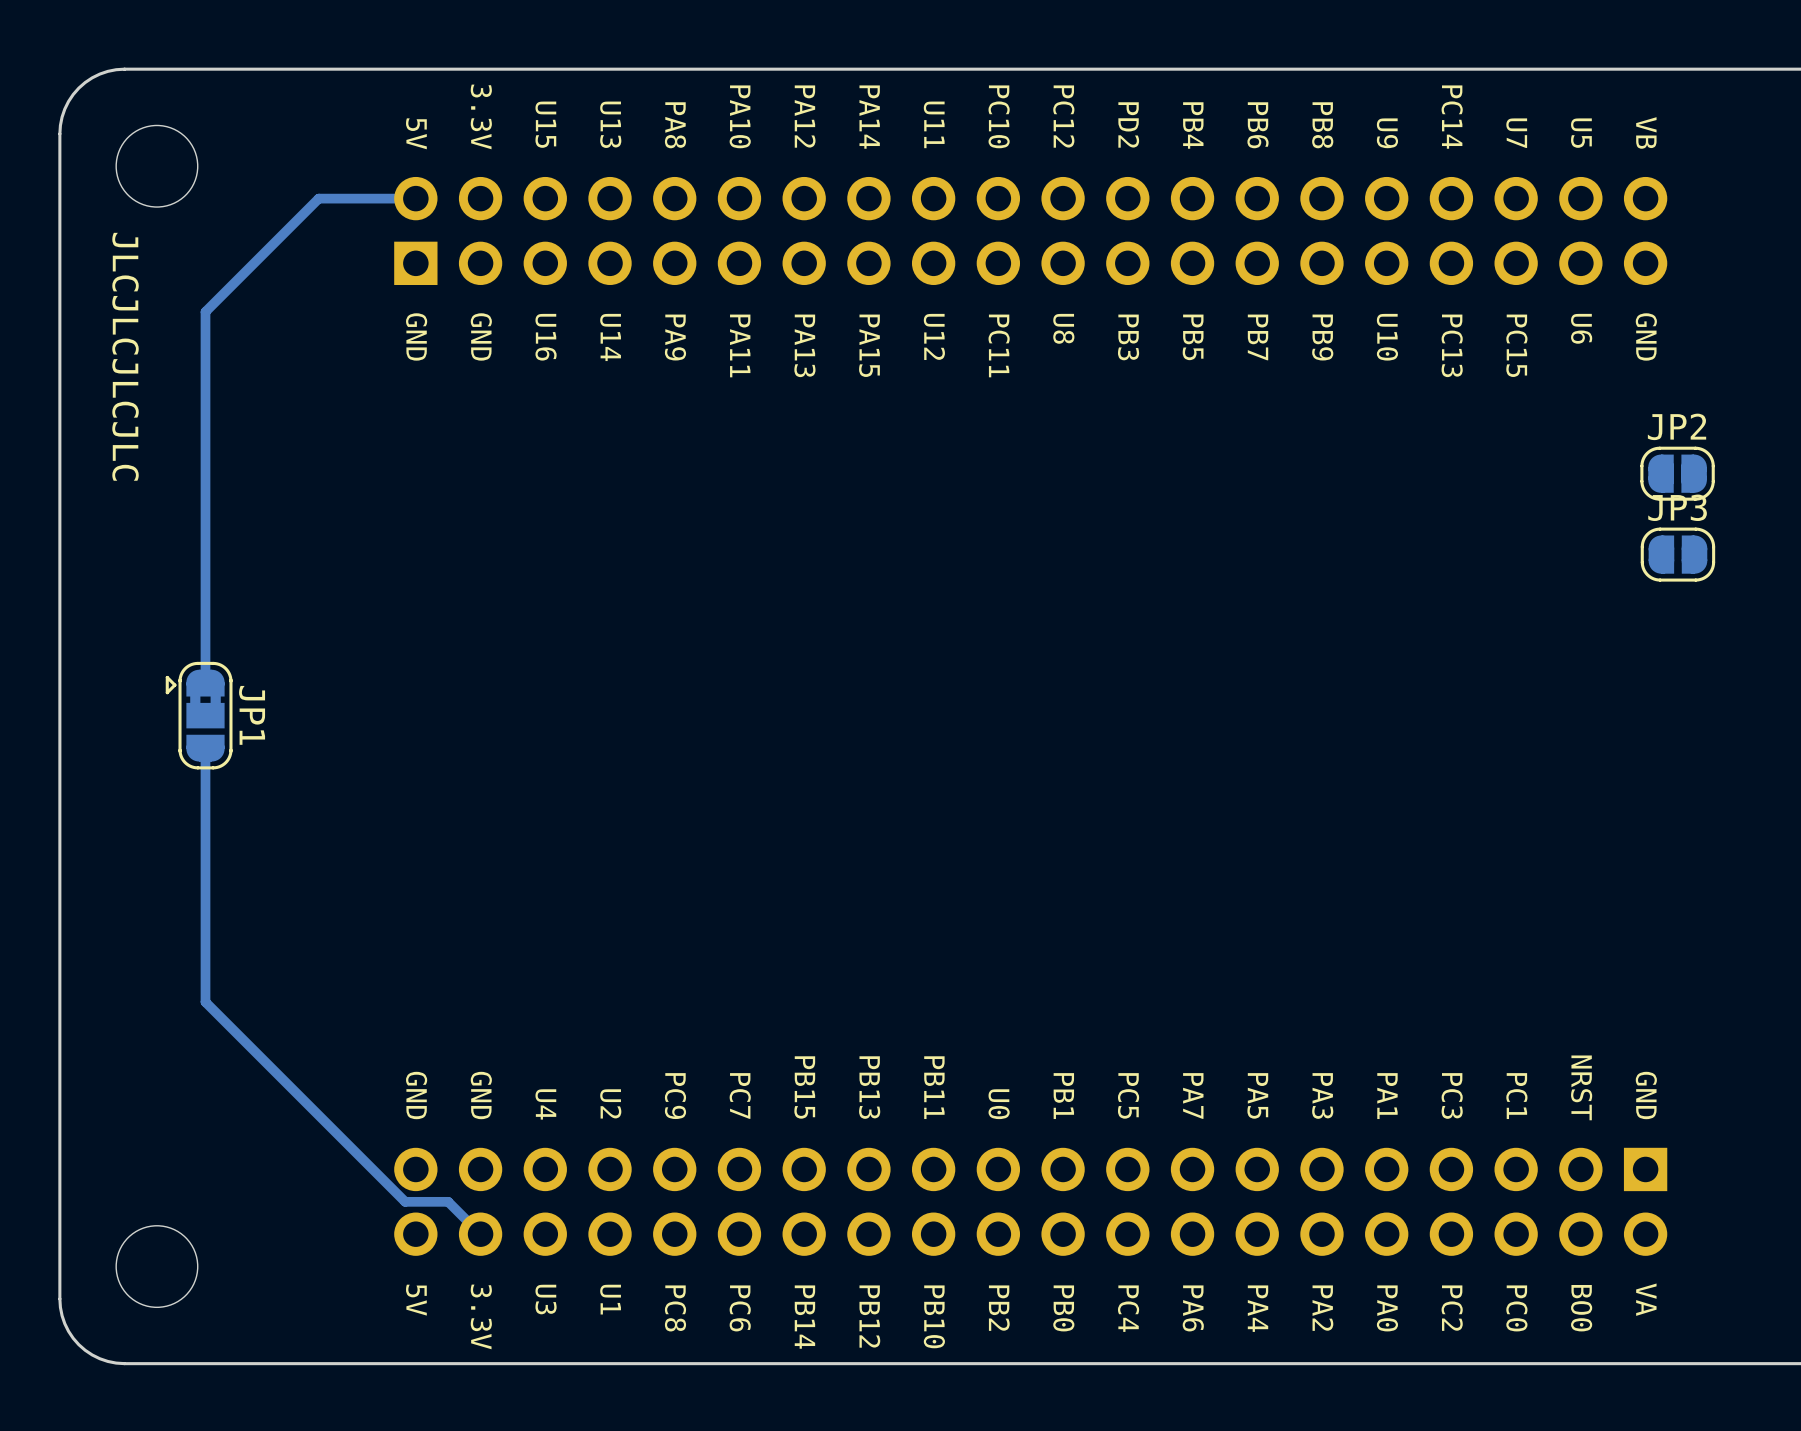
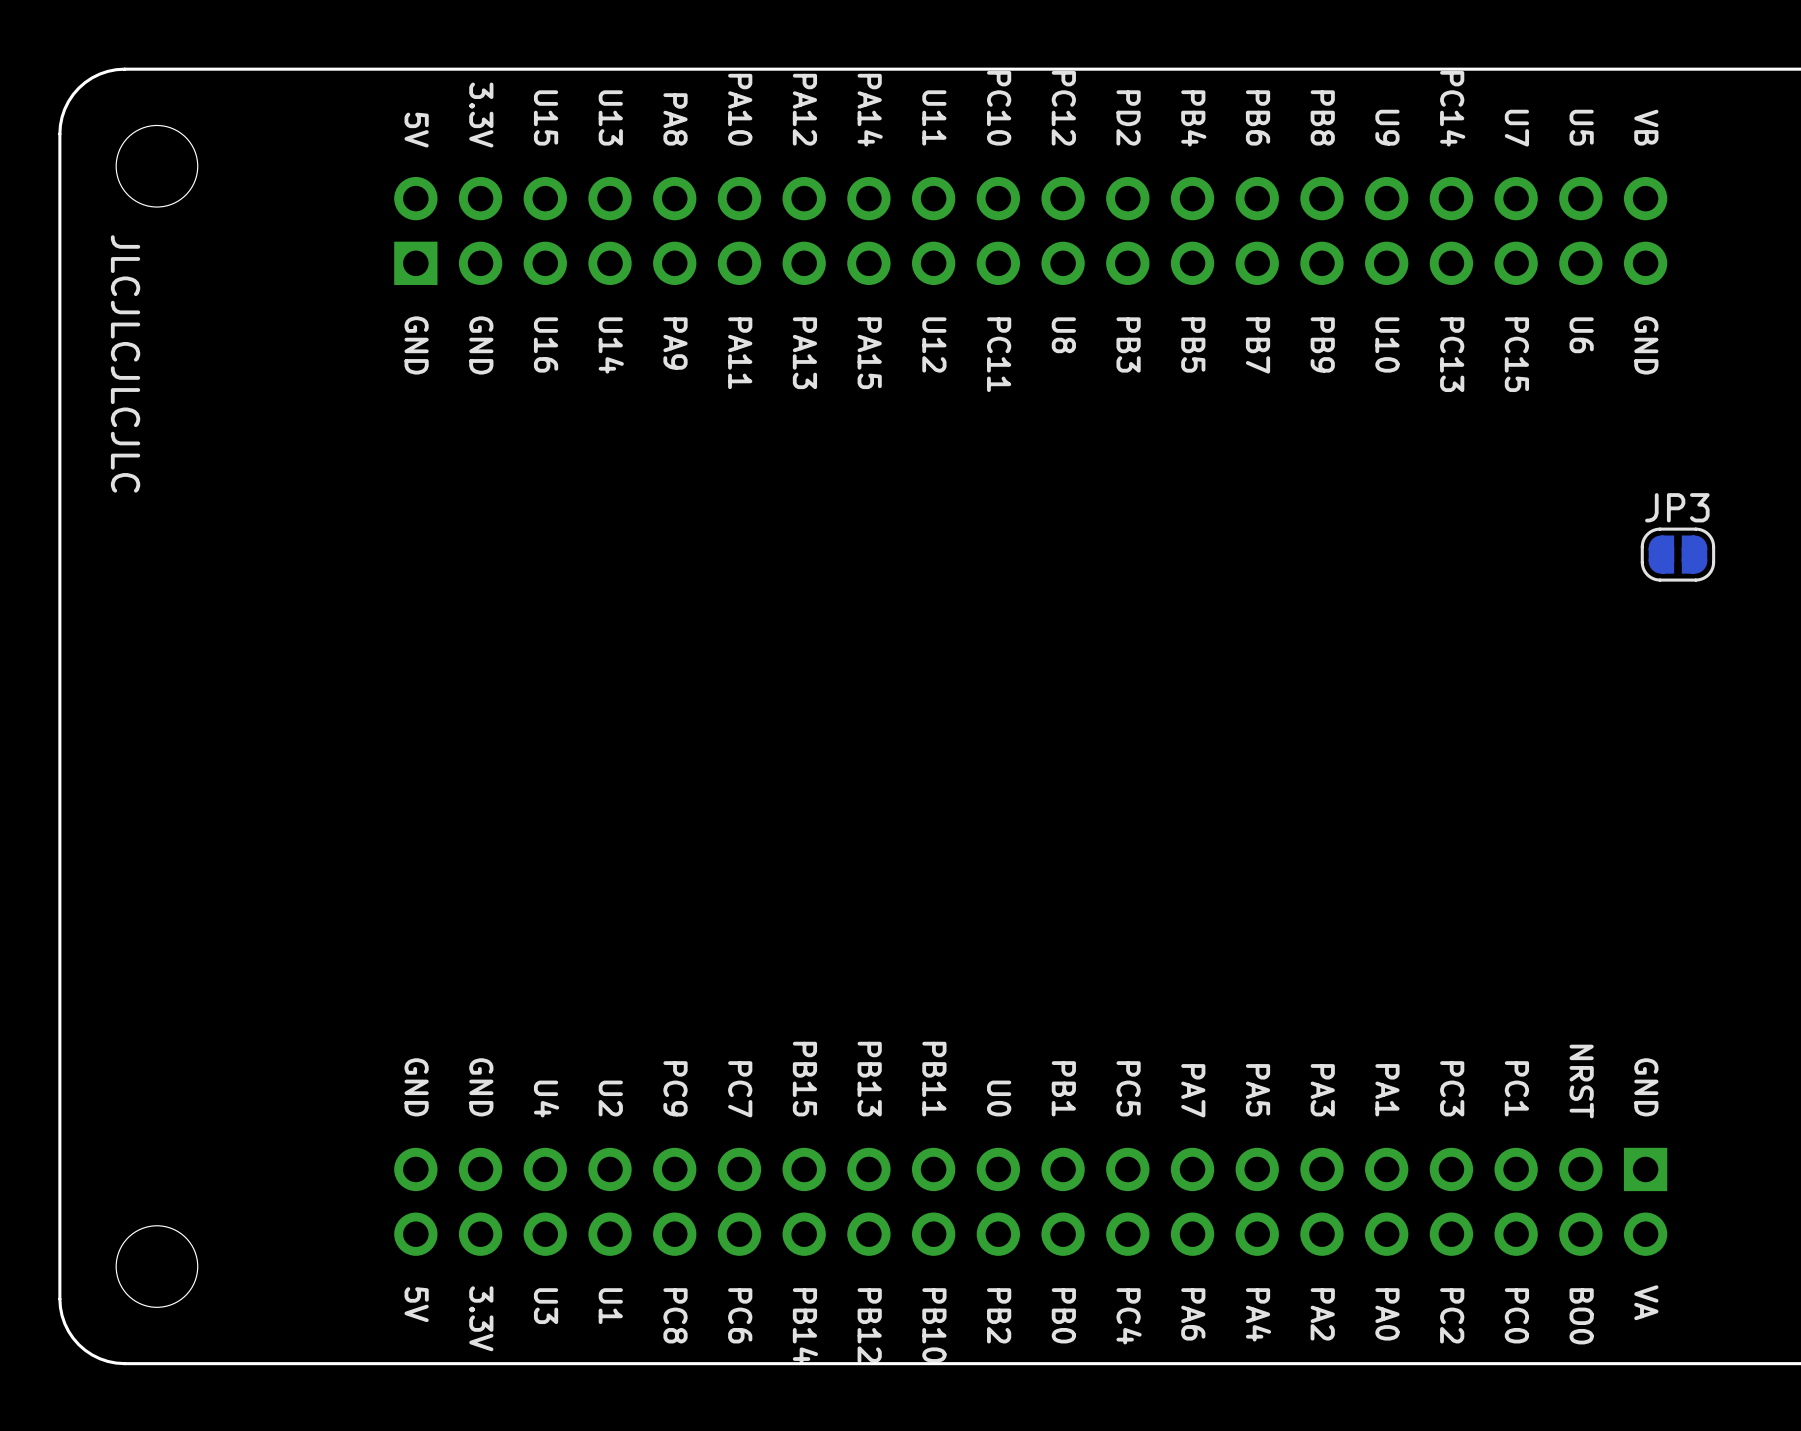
track: (415, 198) (318, 198) (205, 311) (205, 682) -> none
JP2: (1677, 473) -> none
JP1: (199, 715) -> none
track: (205, 748) (205, 1002) (405, 1201) (448, 1201) (480, 1234) -> none

